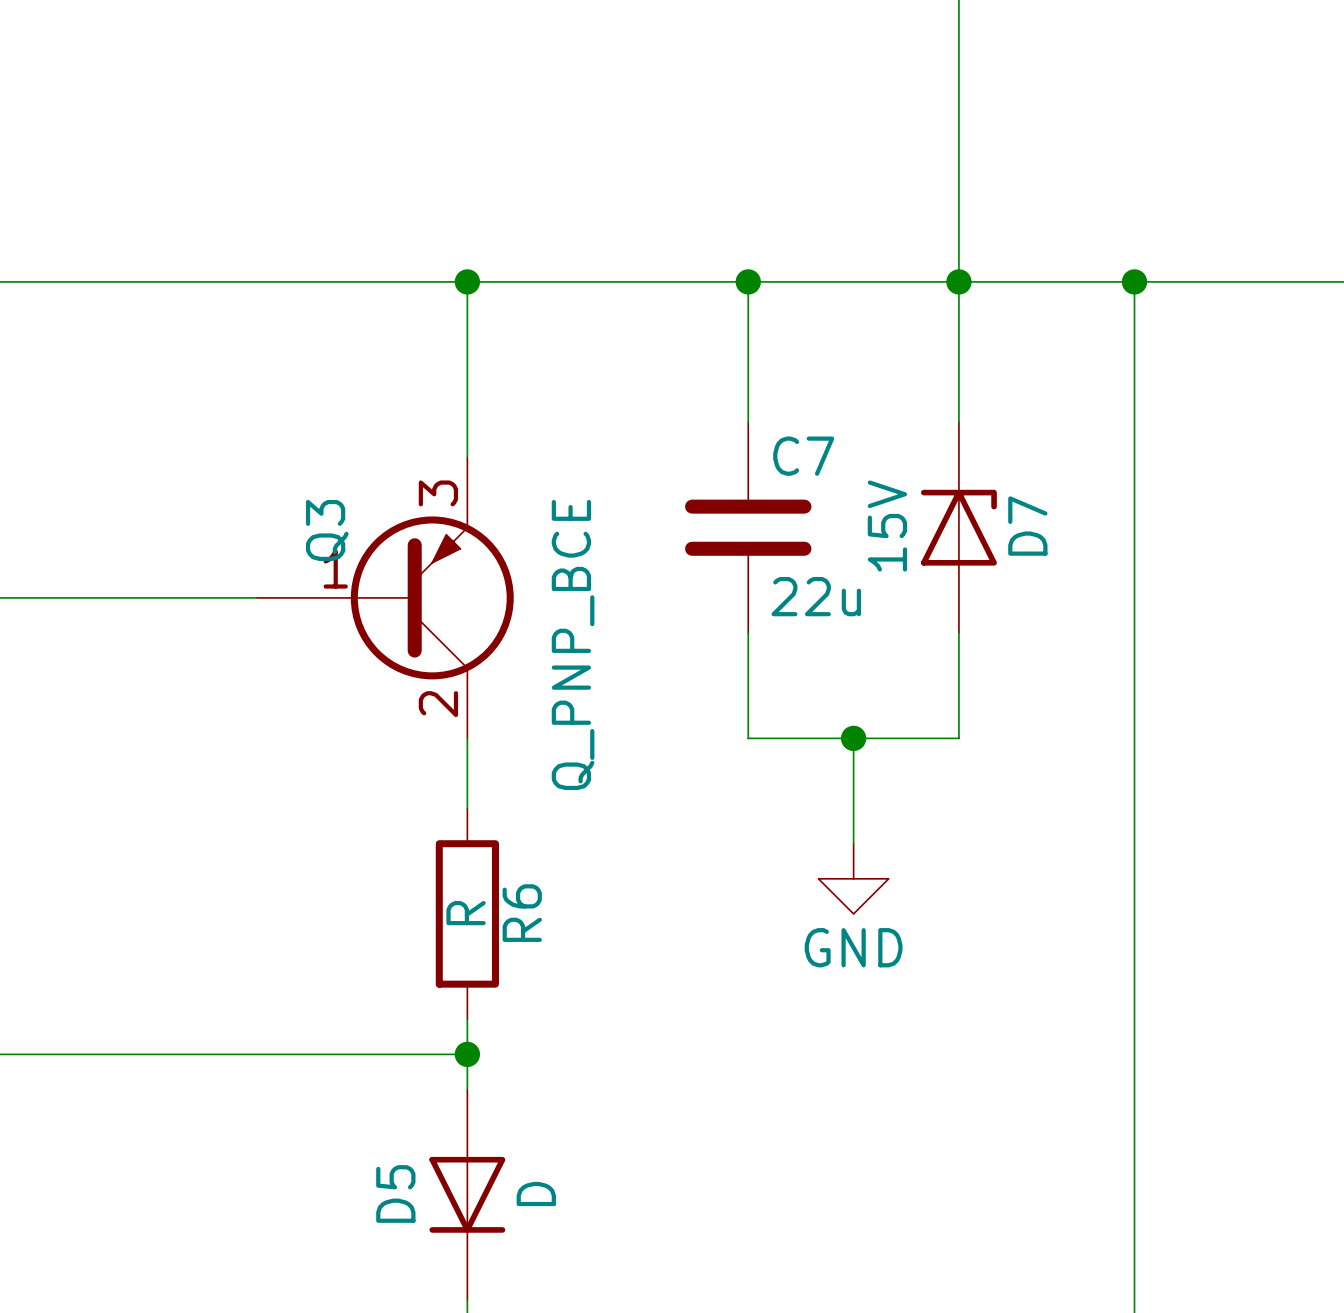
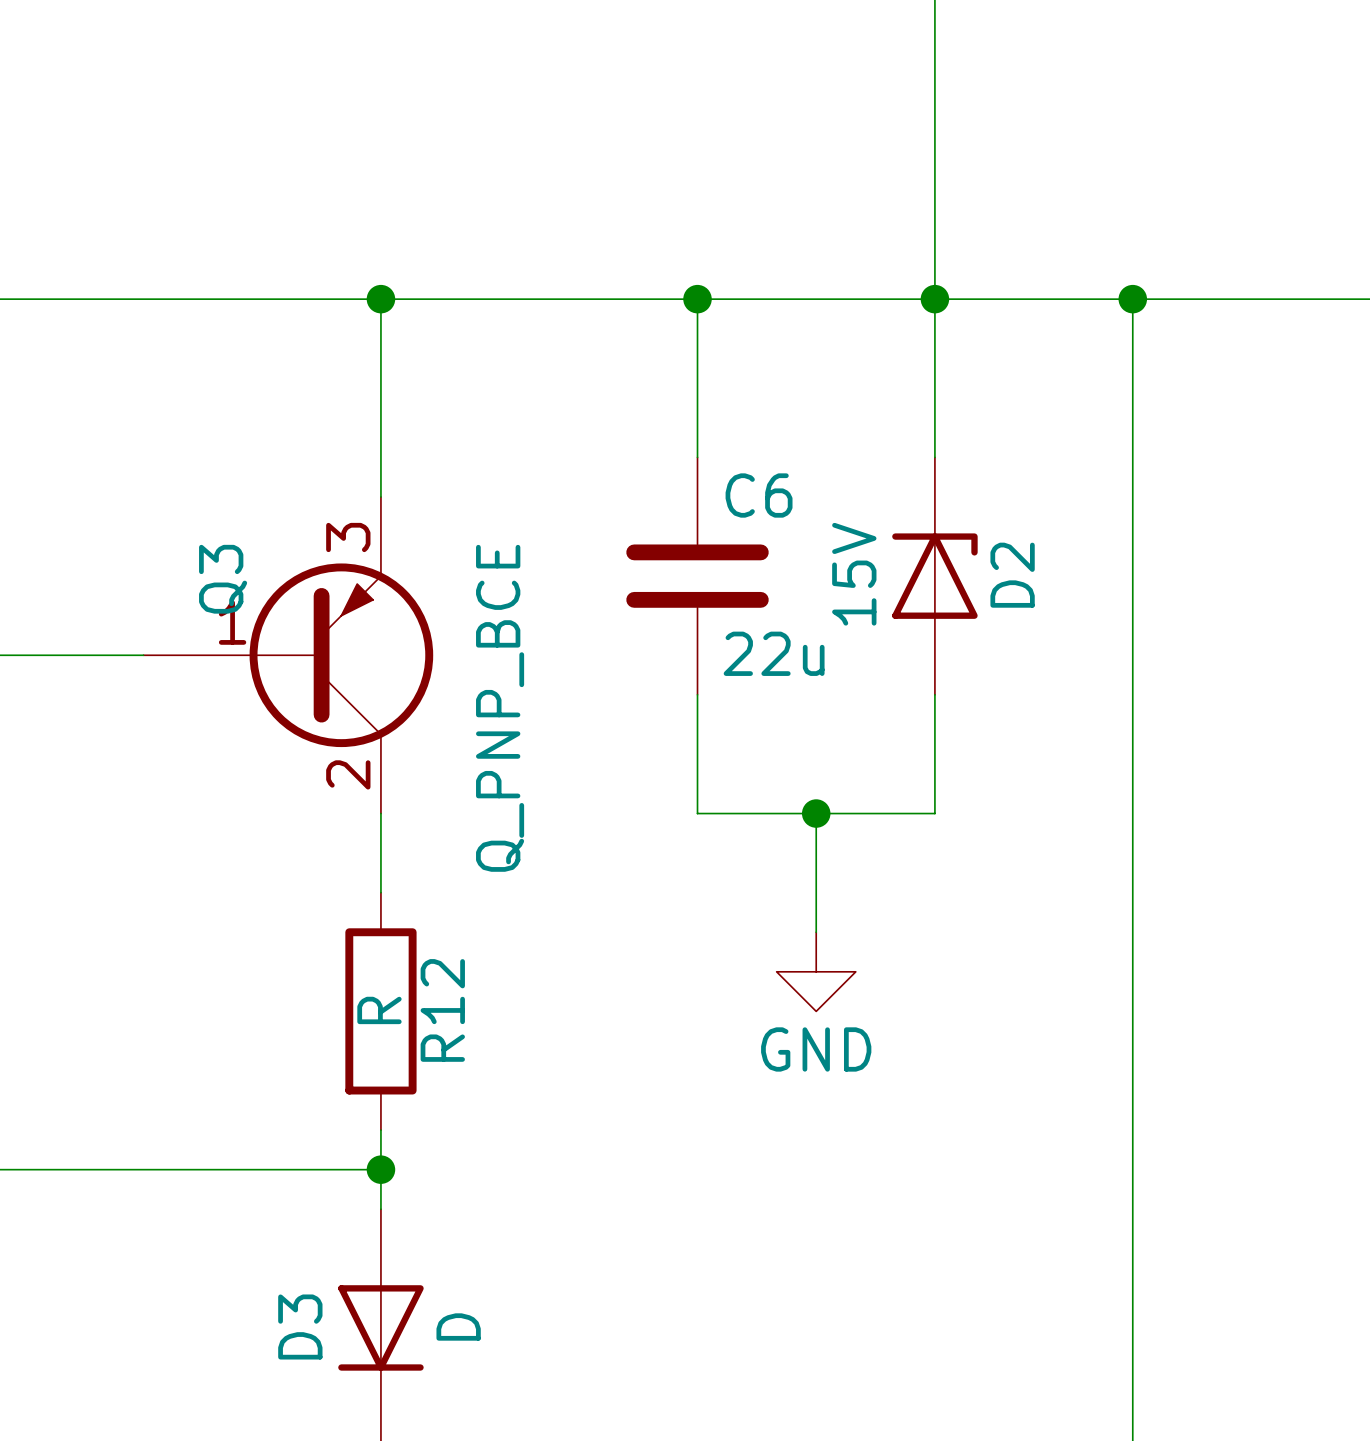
C7 name: C7 (803, 456) -> C6 (759, 495)
D7 name: D7 (1027, 526) -> D2 (1012, 575)
R6 name: R6 (522, 913) -> R12 (442, 1010)
D5 name: D5 (395, 1193) -> D3 (300, 1327)

